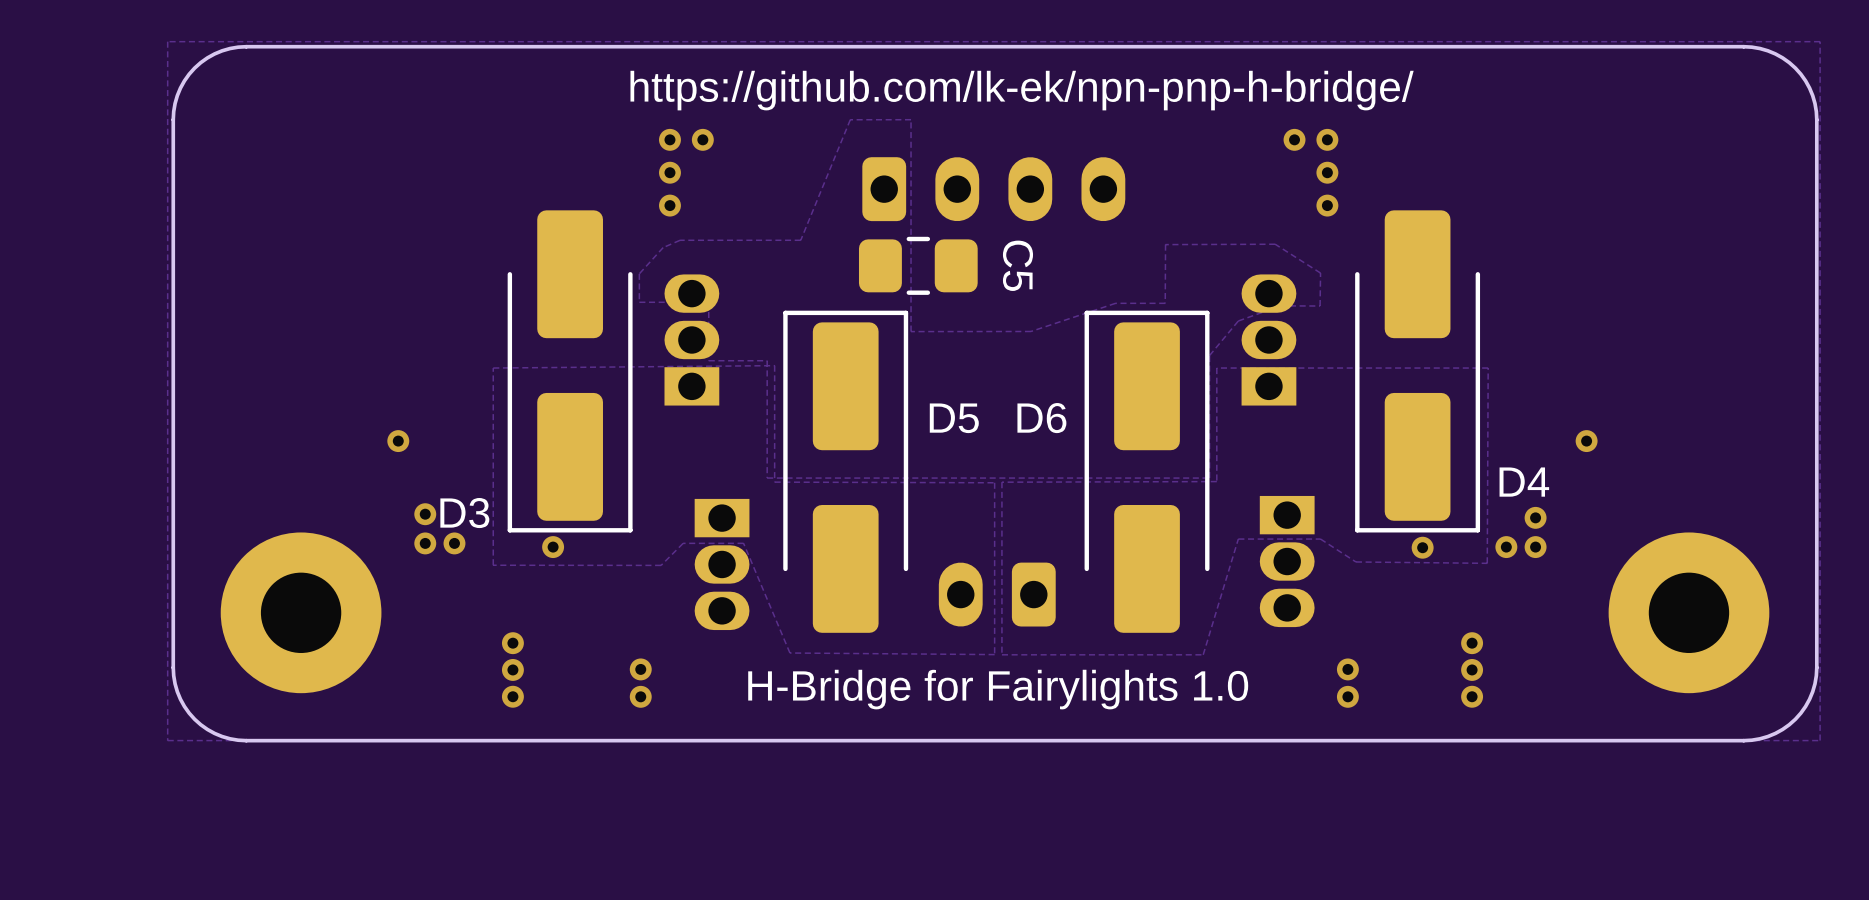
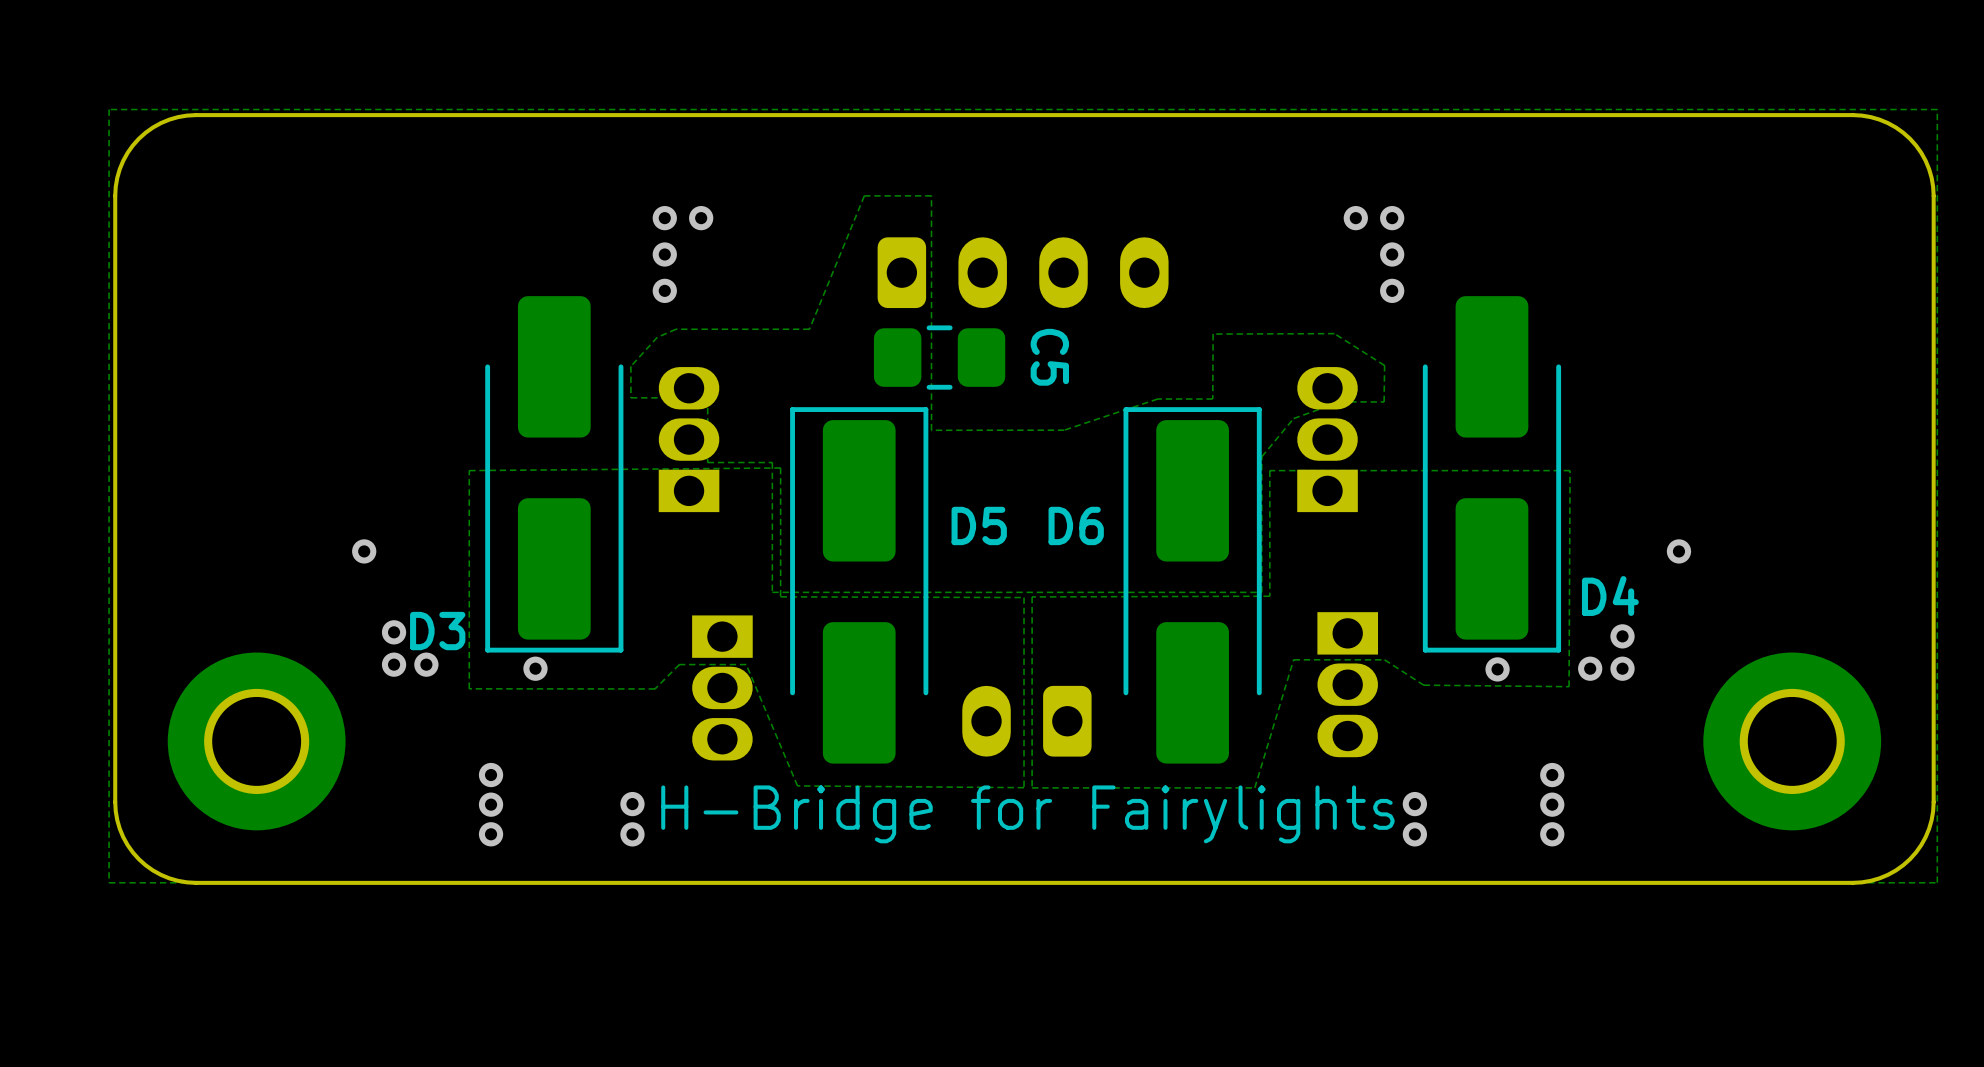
text: https://github.com/lk-ek/npn-pnp-h-bridge/ (1022, 90) -> none
text: H-Bridge for Fairylights 1.0 (998, 689) -> H-Bridge for Fairylights (1027, 814)

